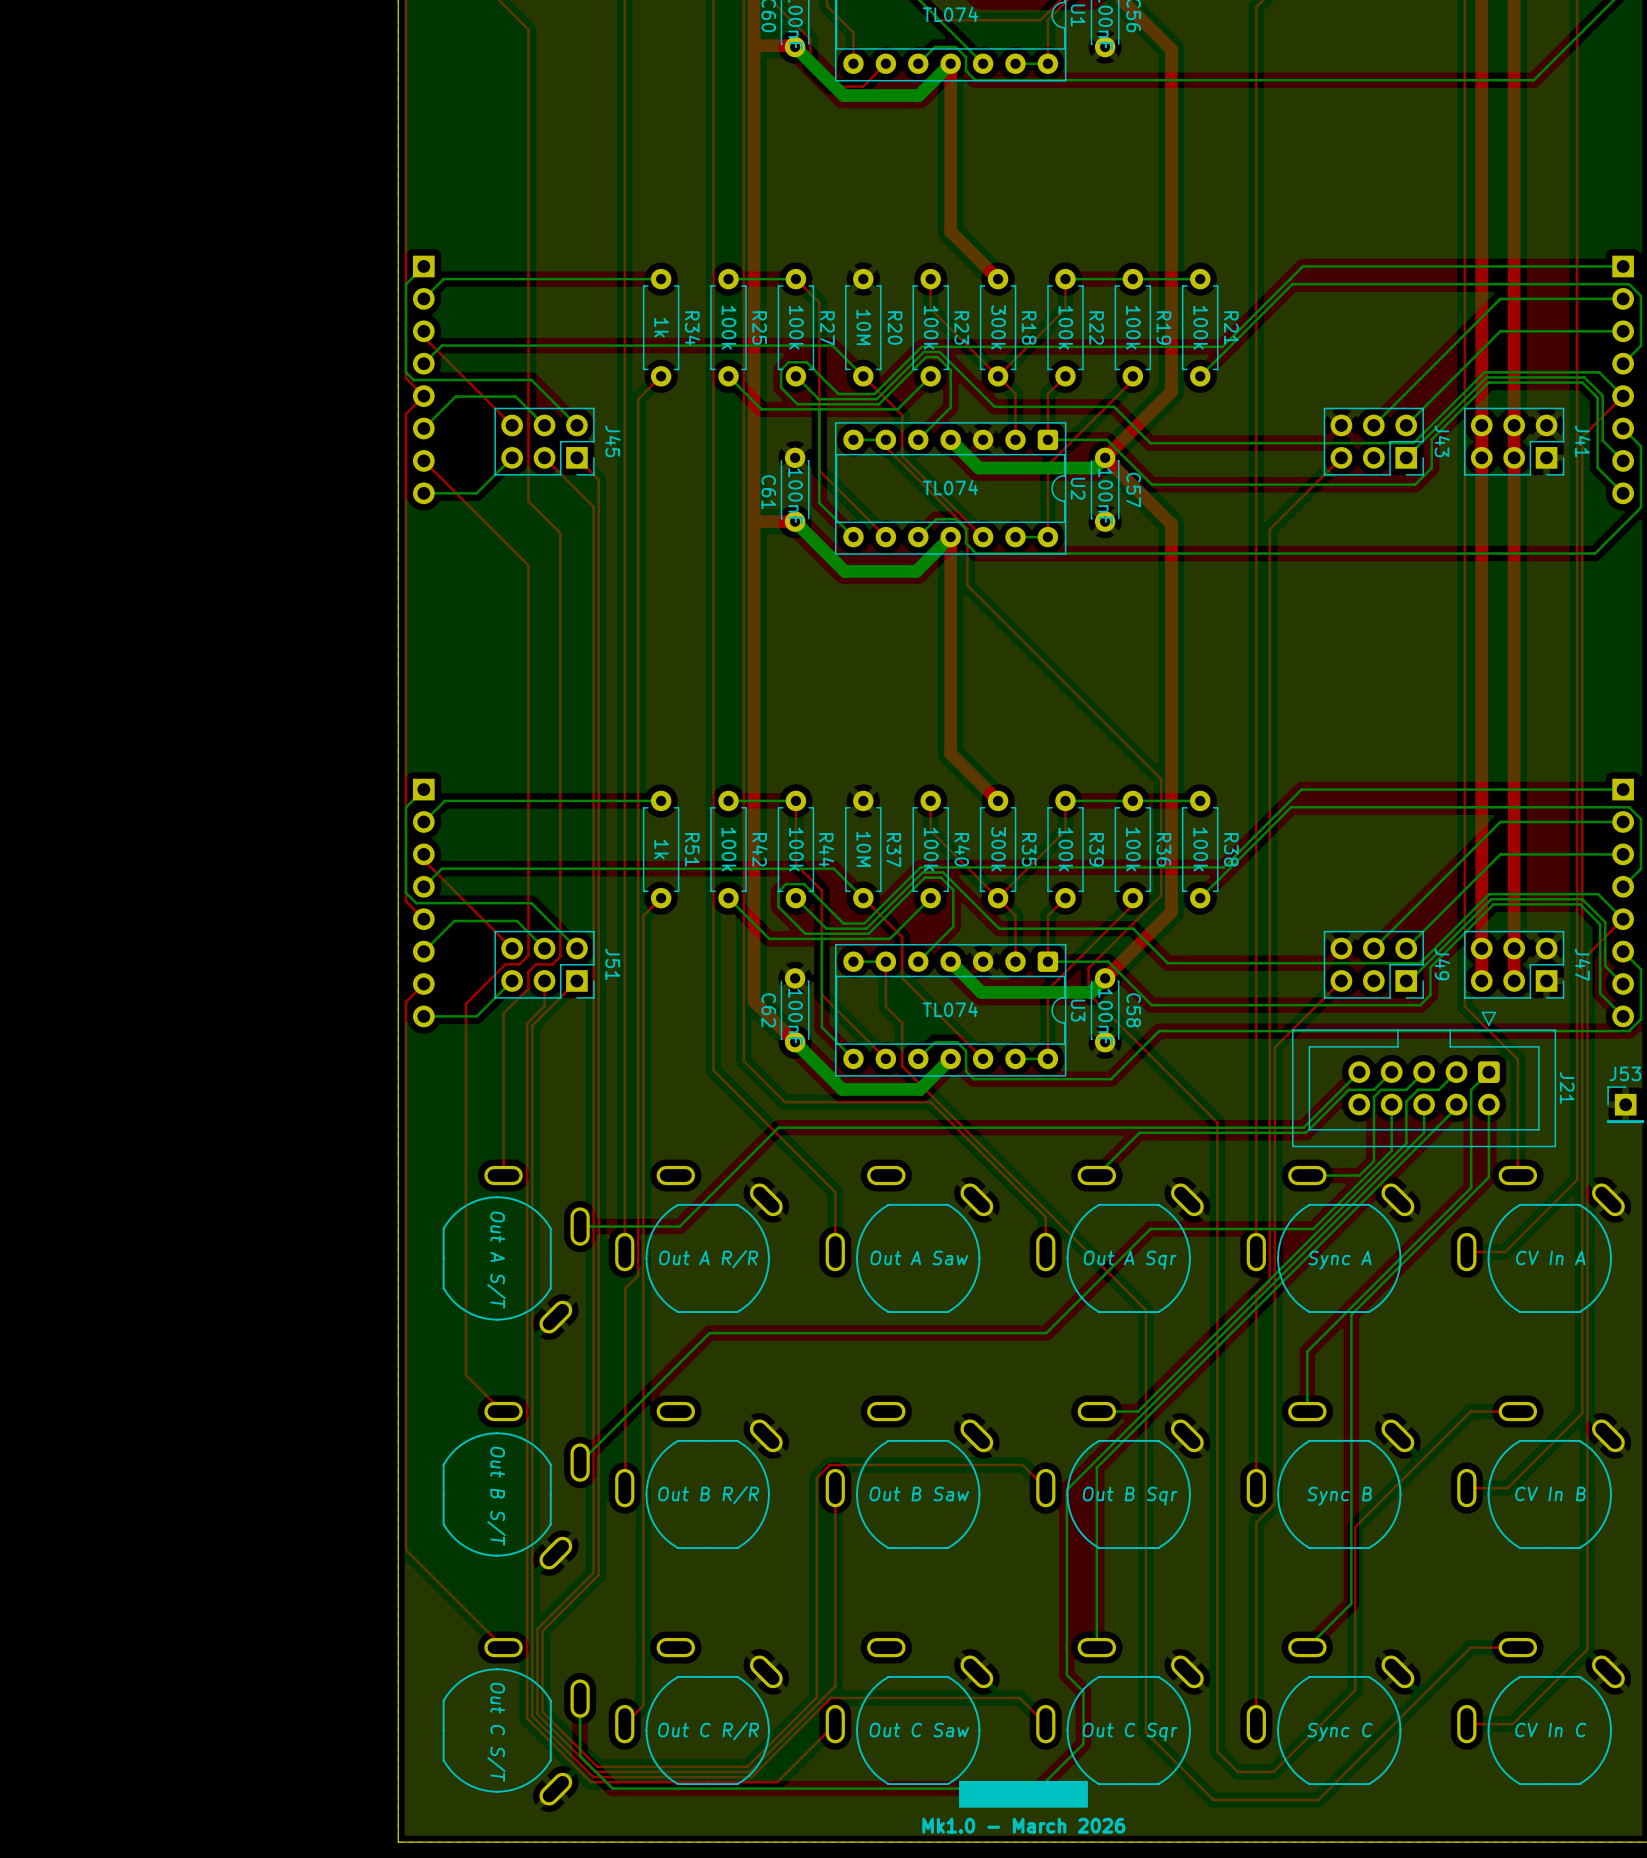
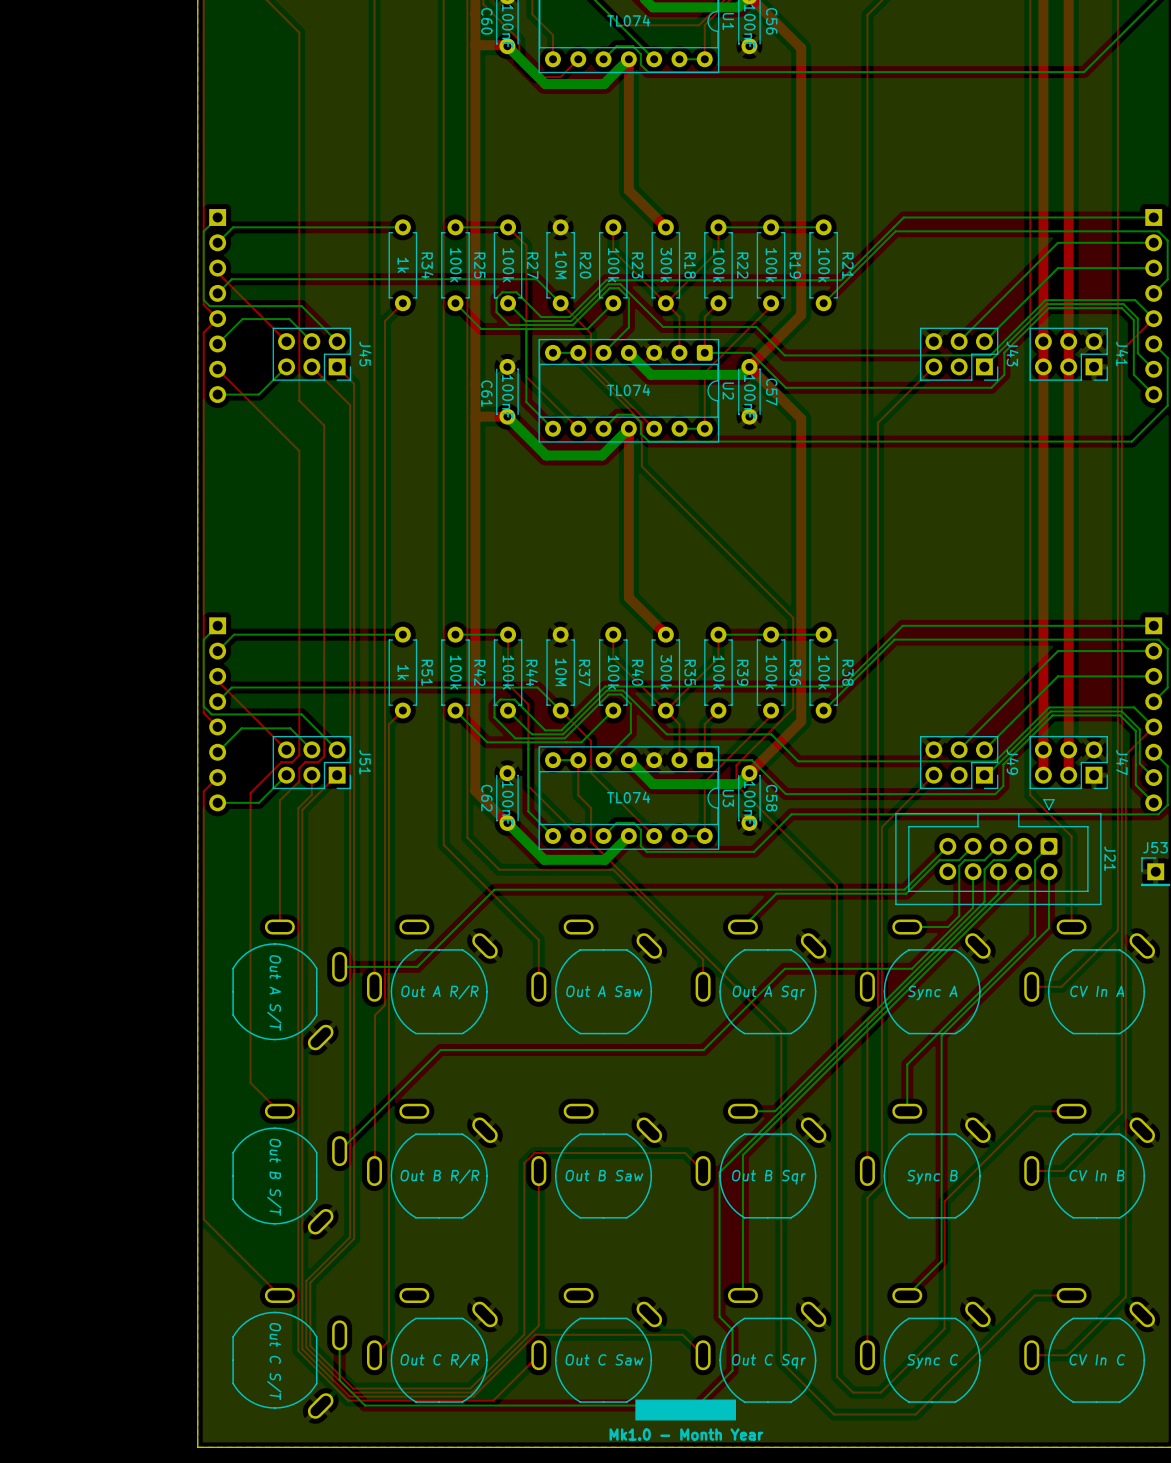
text: Mk1.0 - March 2026 (1023, 1825) -> Mk1.0 - Month Year (686, 1434)

